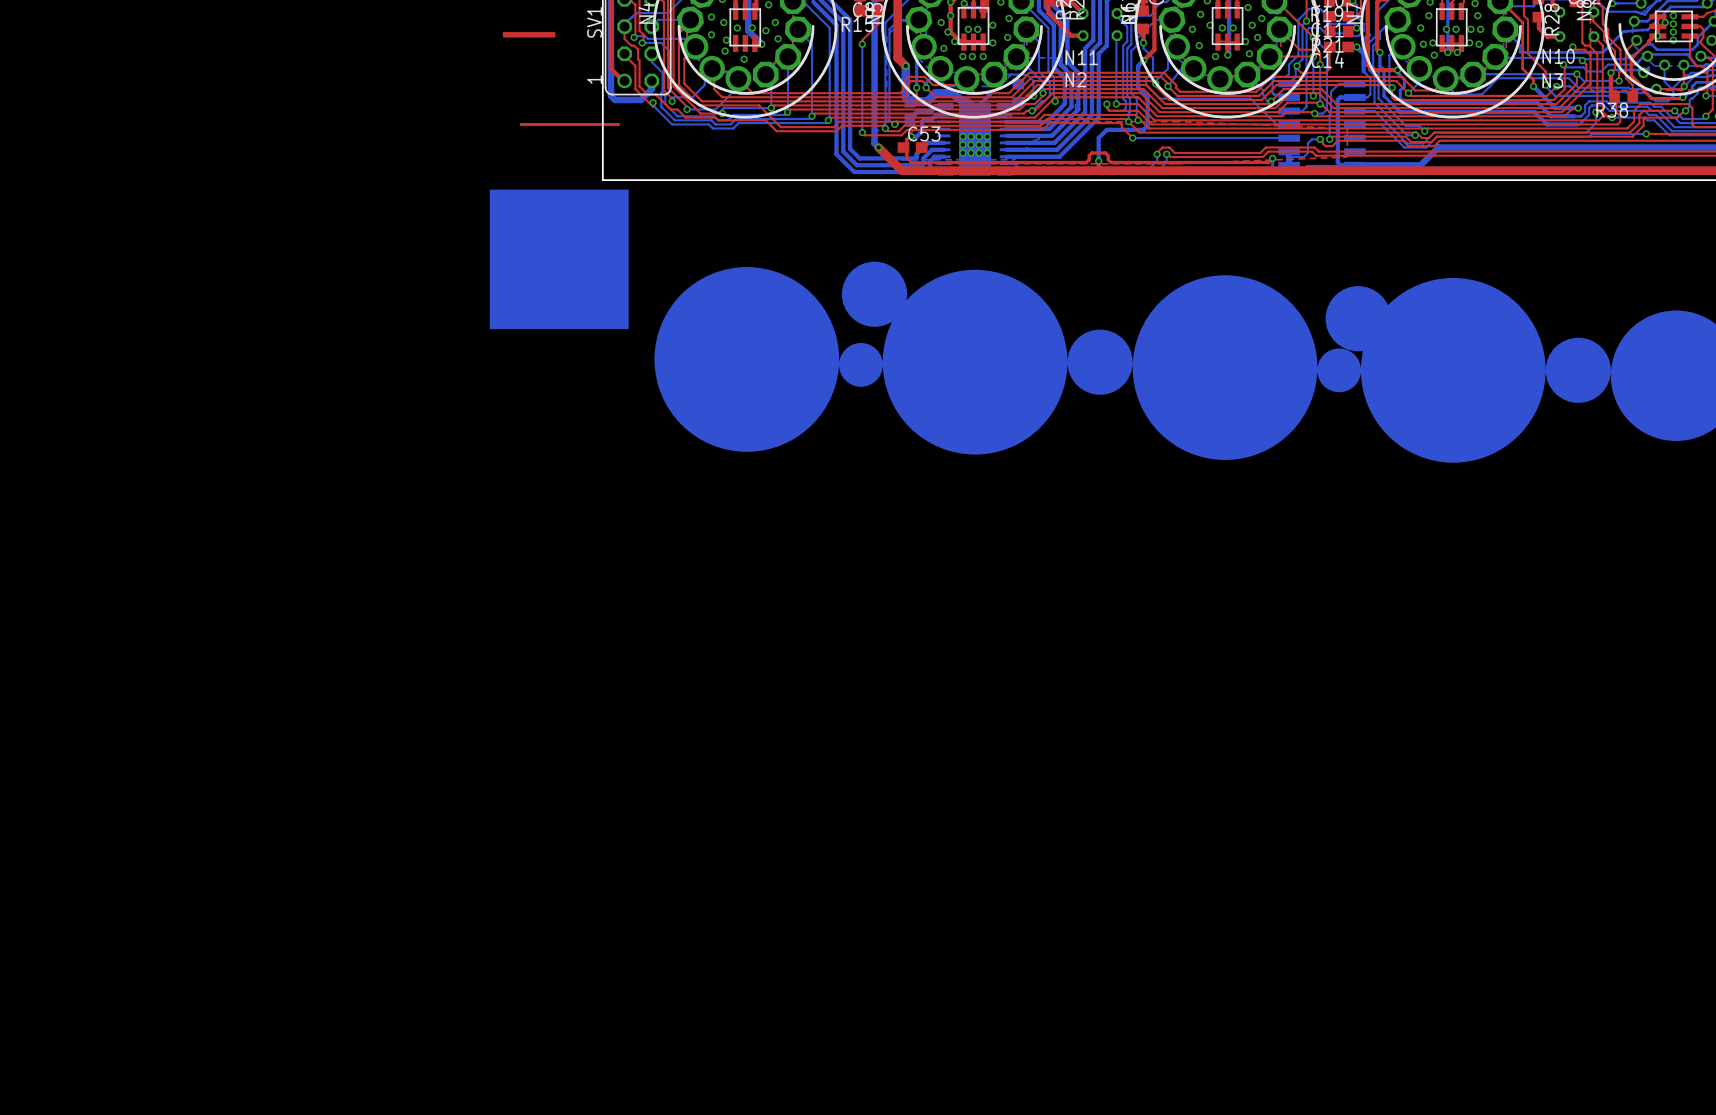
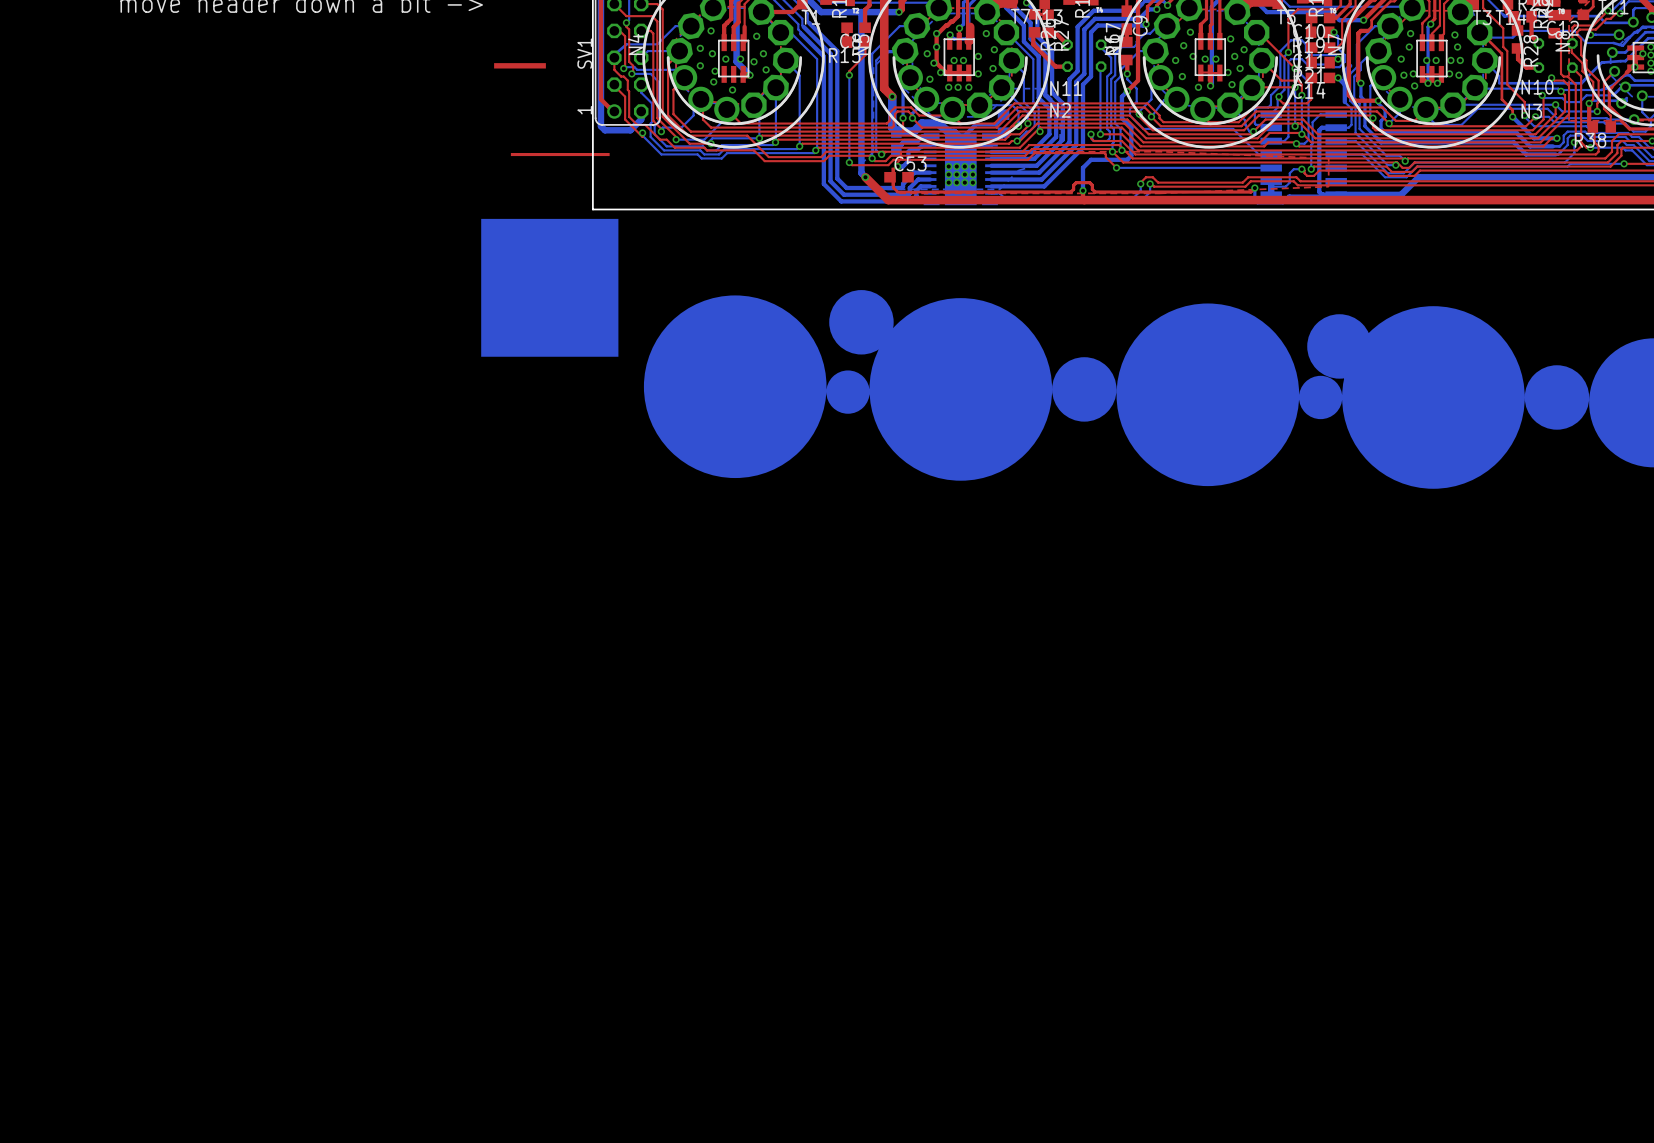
bottom track: none -> (1004, 116) (996, 124) (975, 124)

